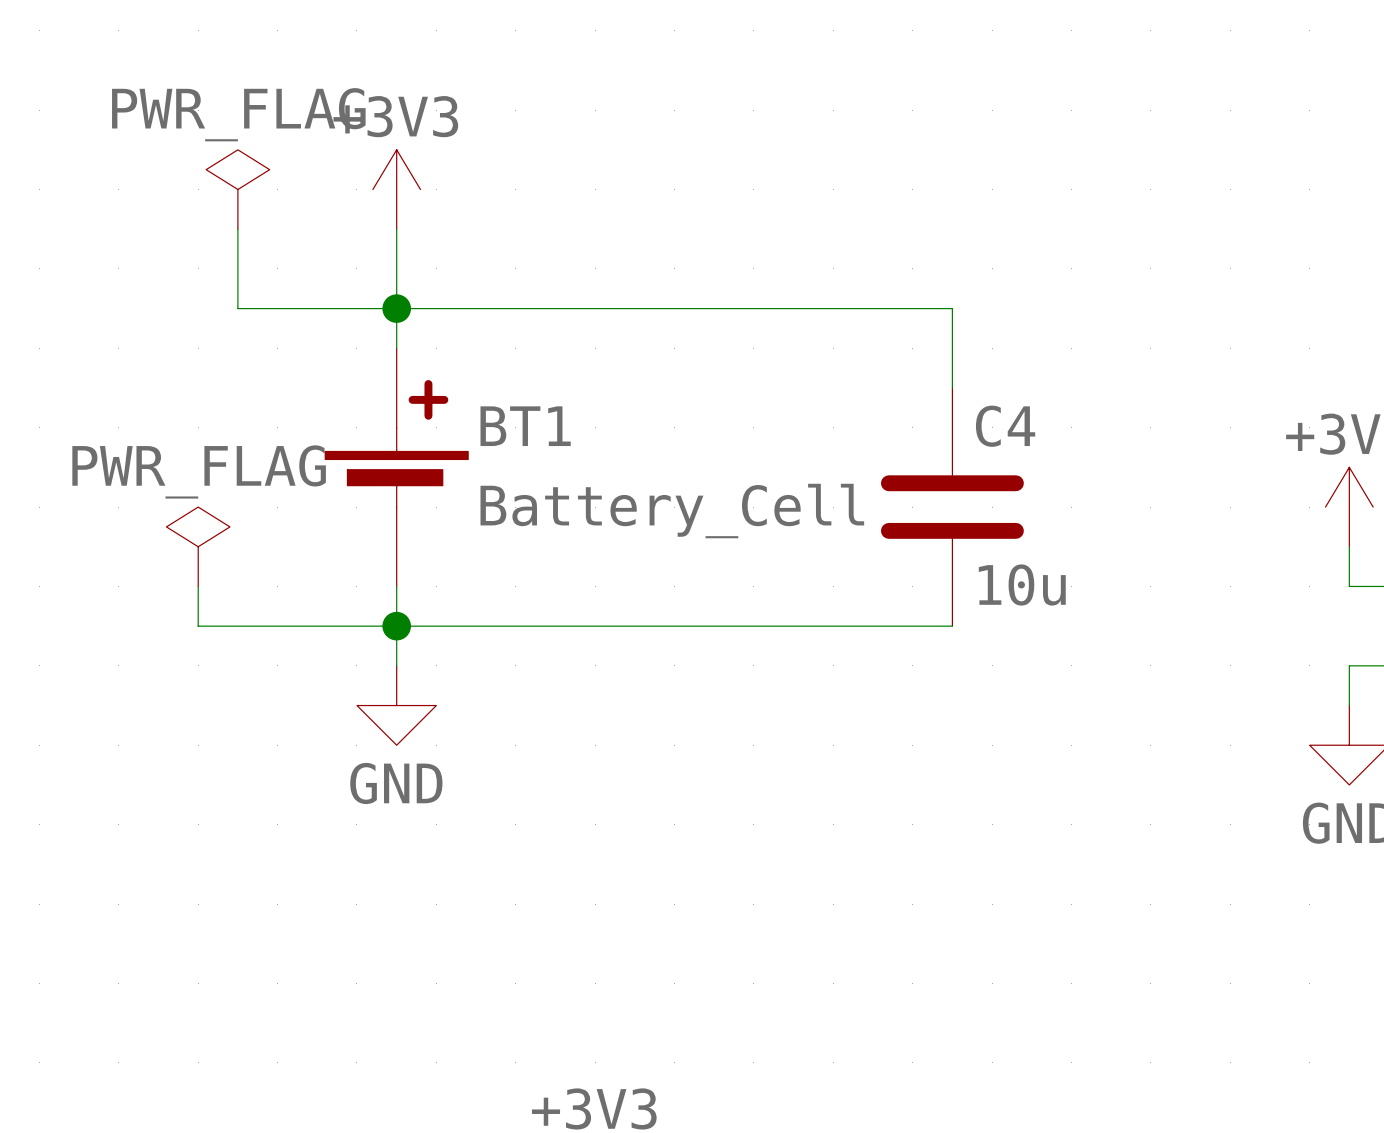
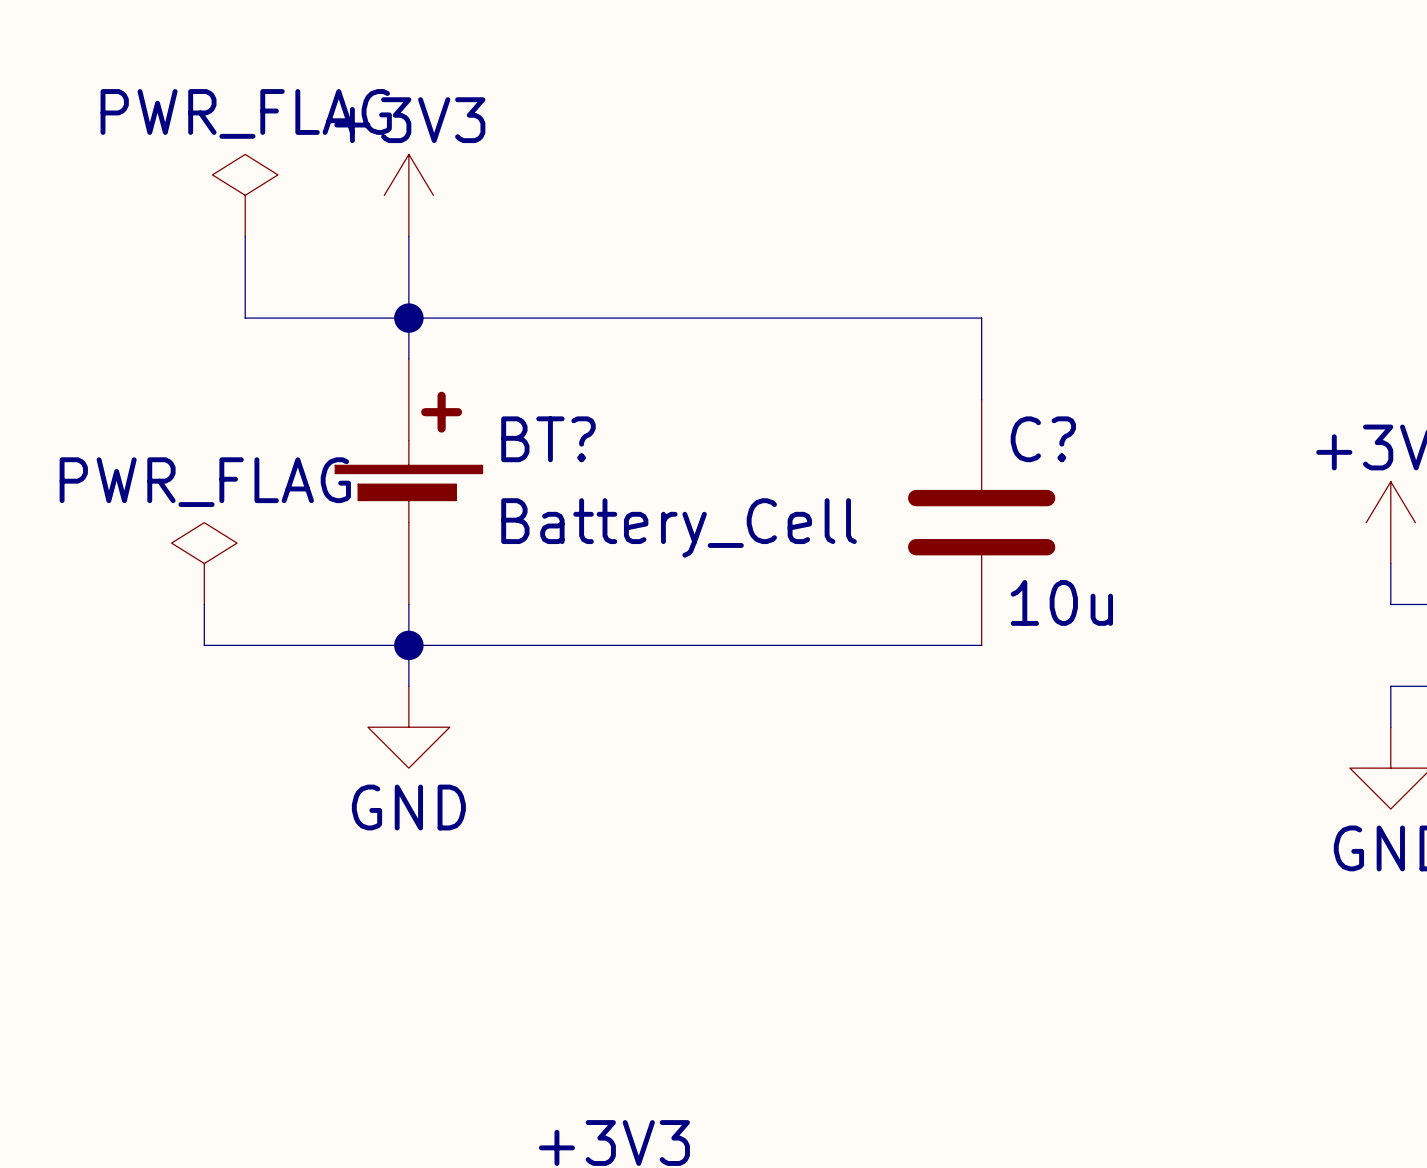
BT1 name: BT1 (525, 426) -> BT? (548, 439)
C4 name: C4 (1005, 426) -> C? (1043, 439)

